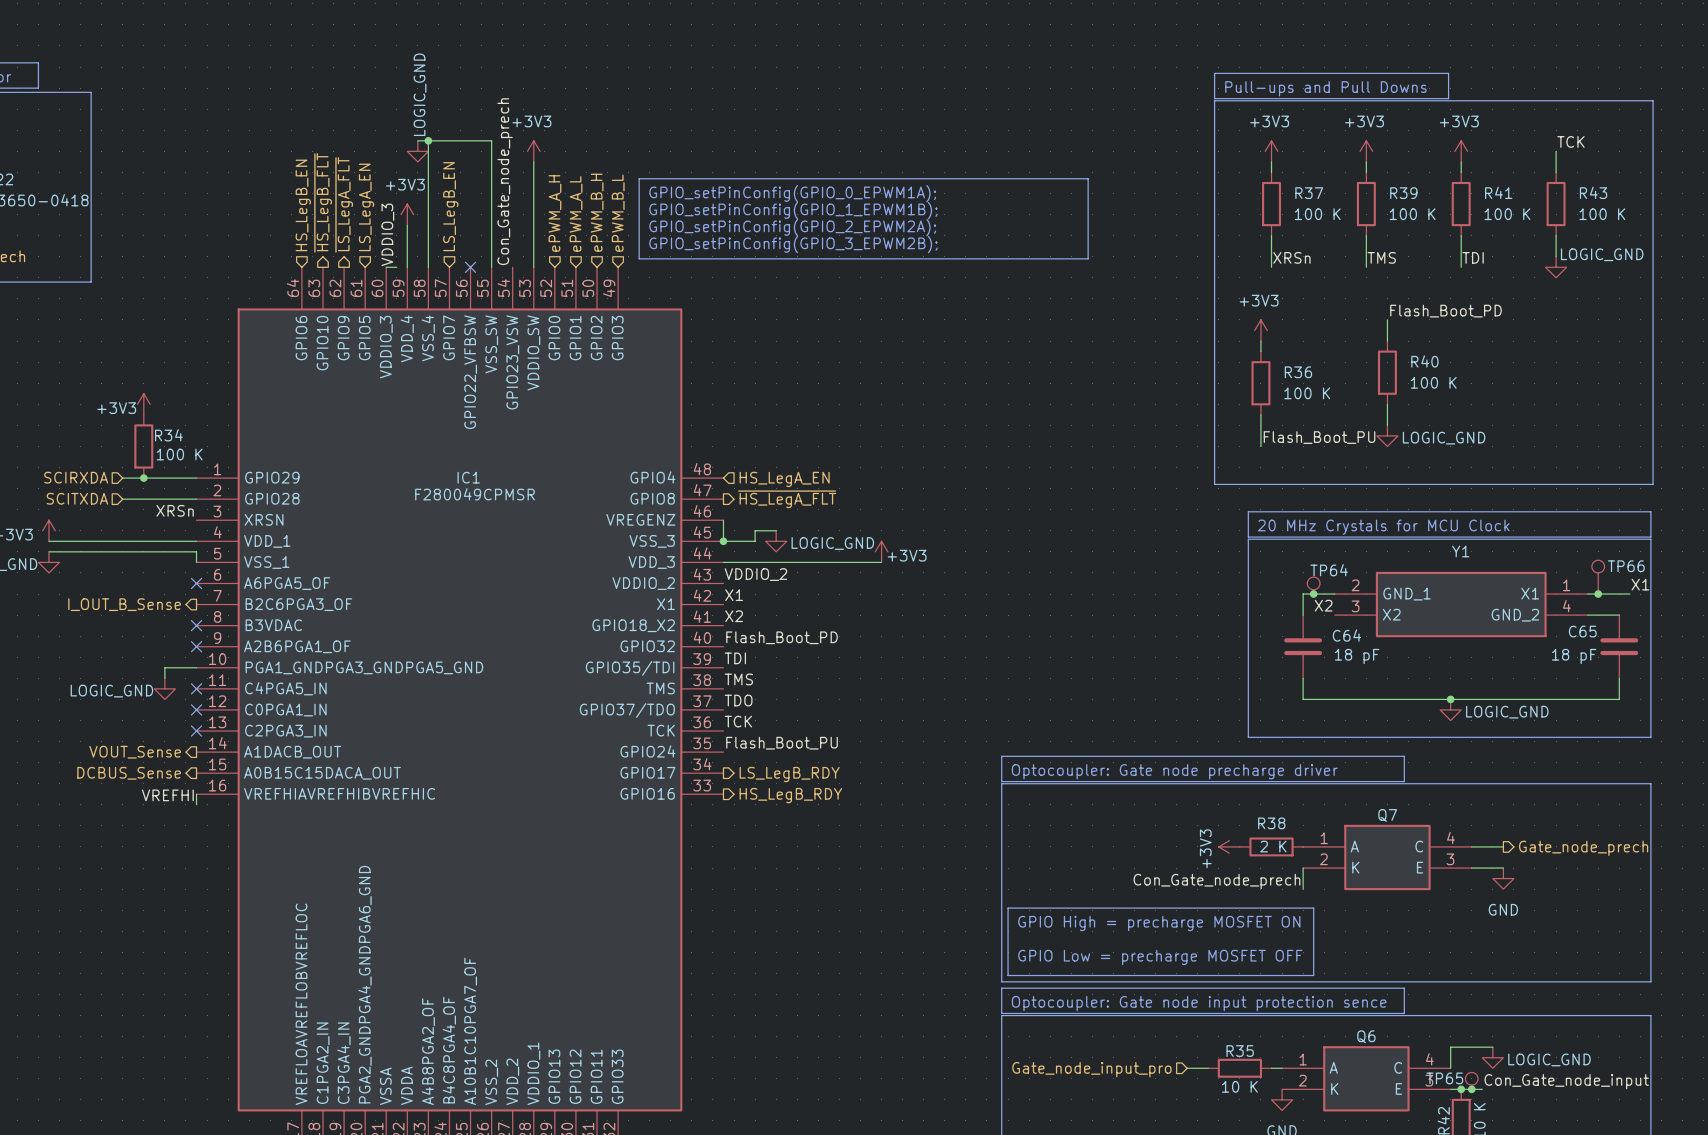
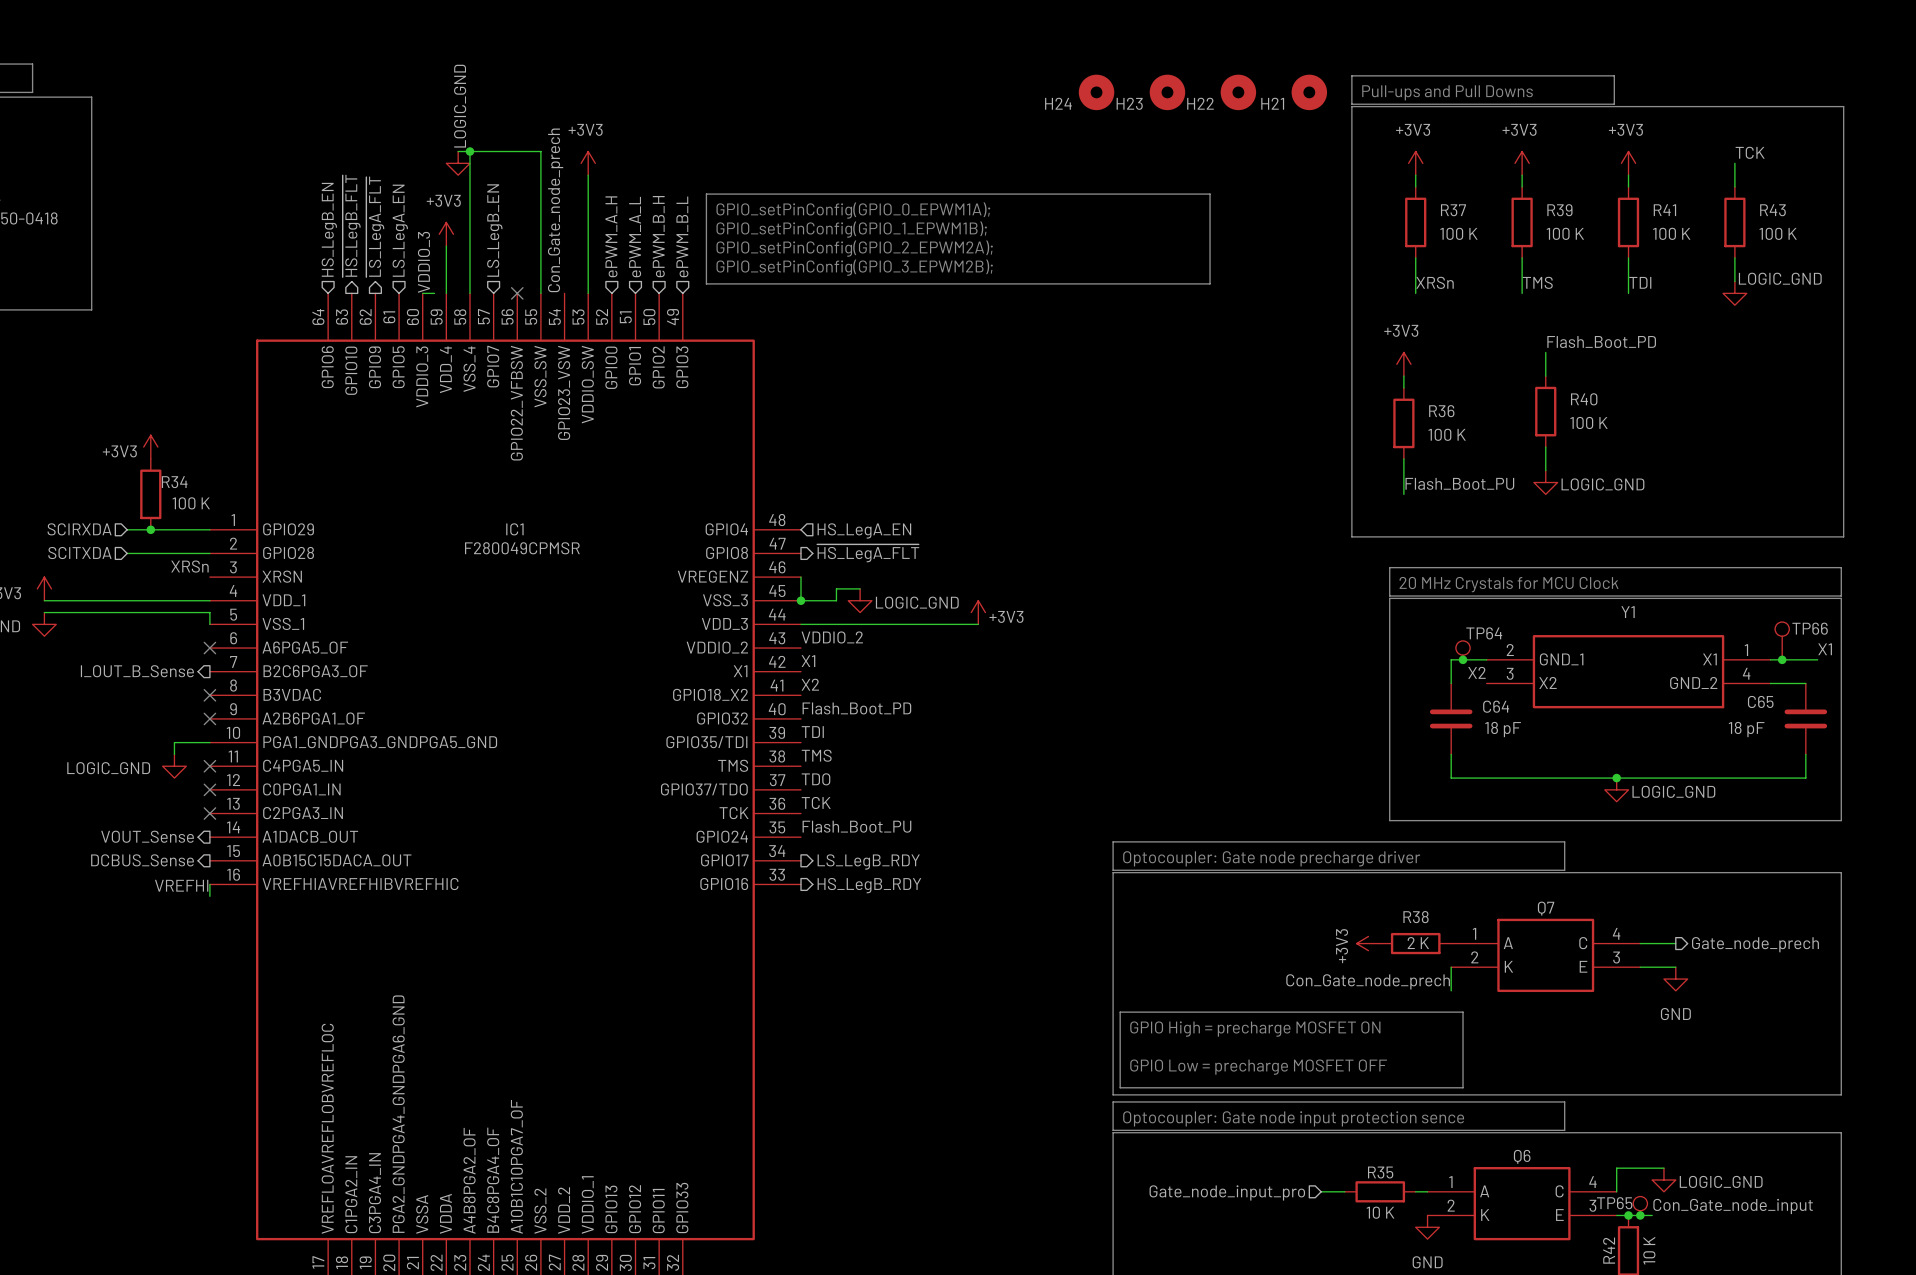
H24: none -> (1096, 92)
H23: none -> (1167, 92)
H22: none -> (1238, 92)
H21: none -> (1309, 92)

